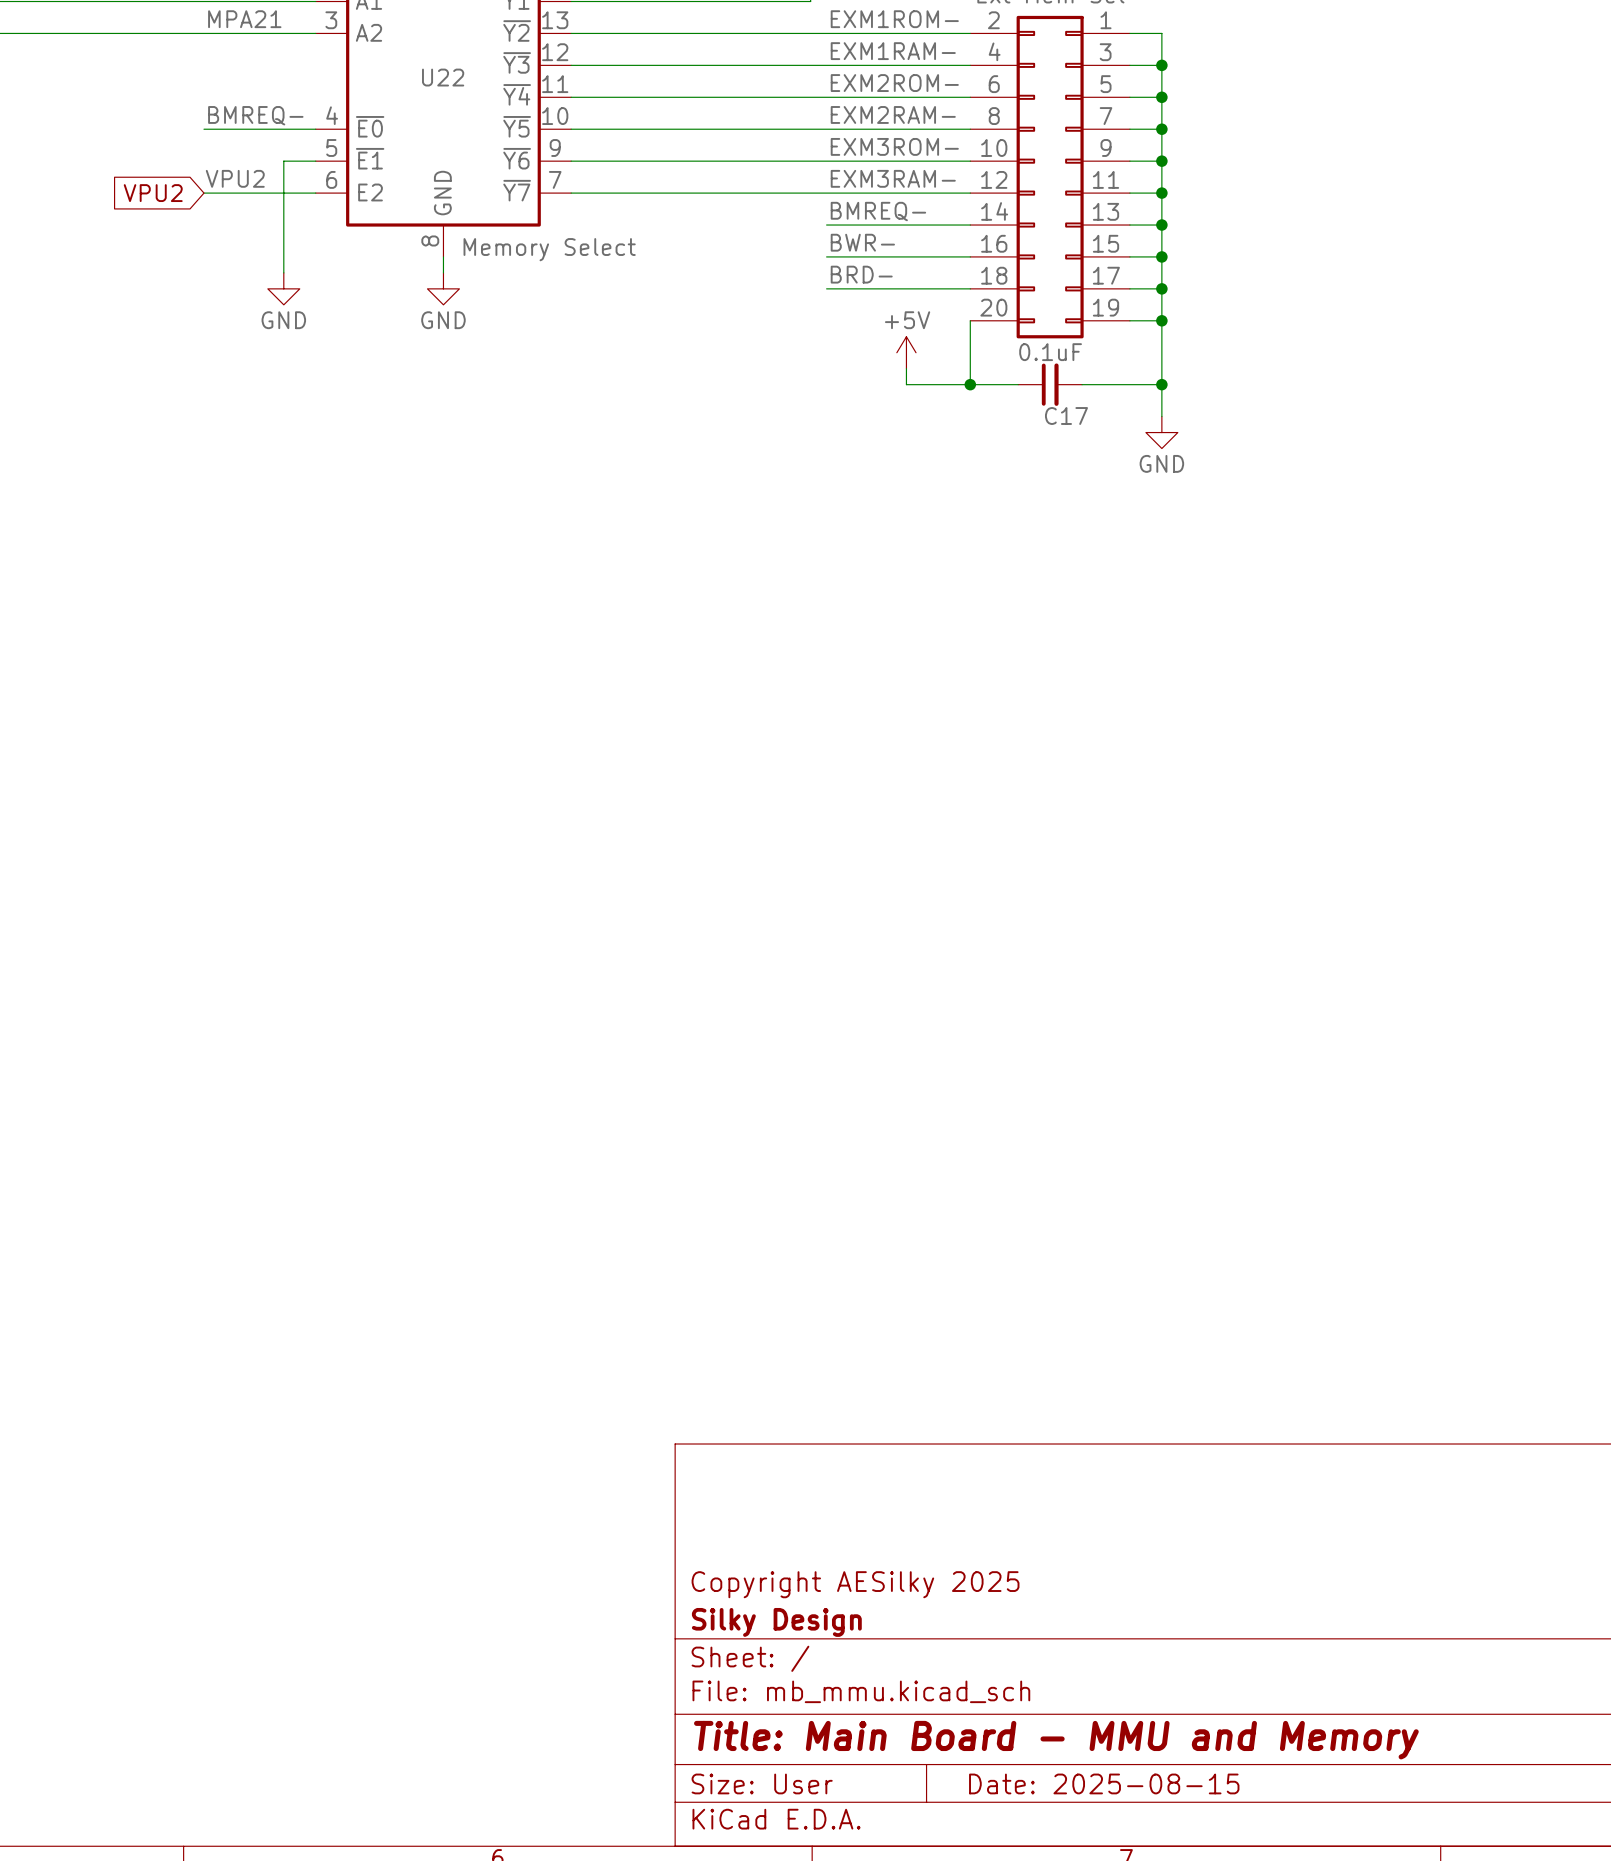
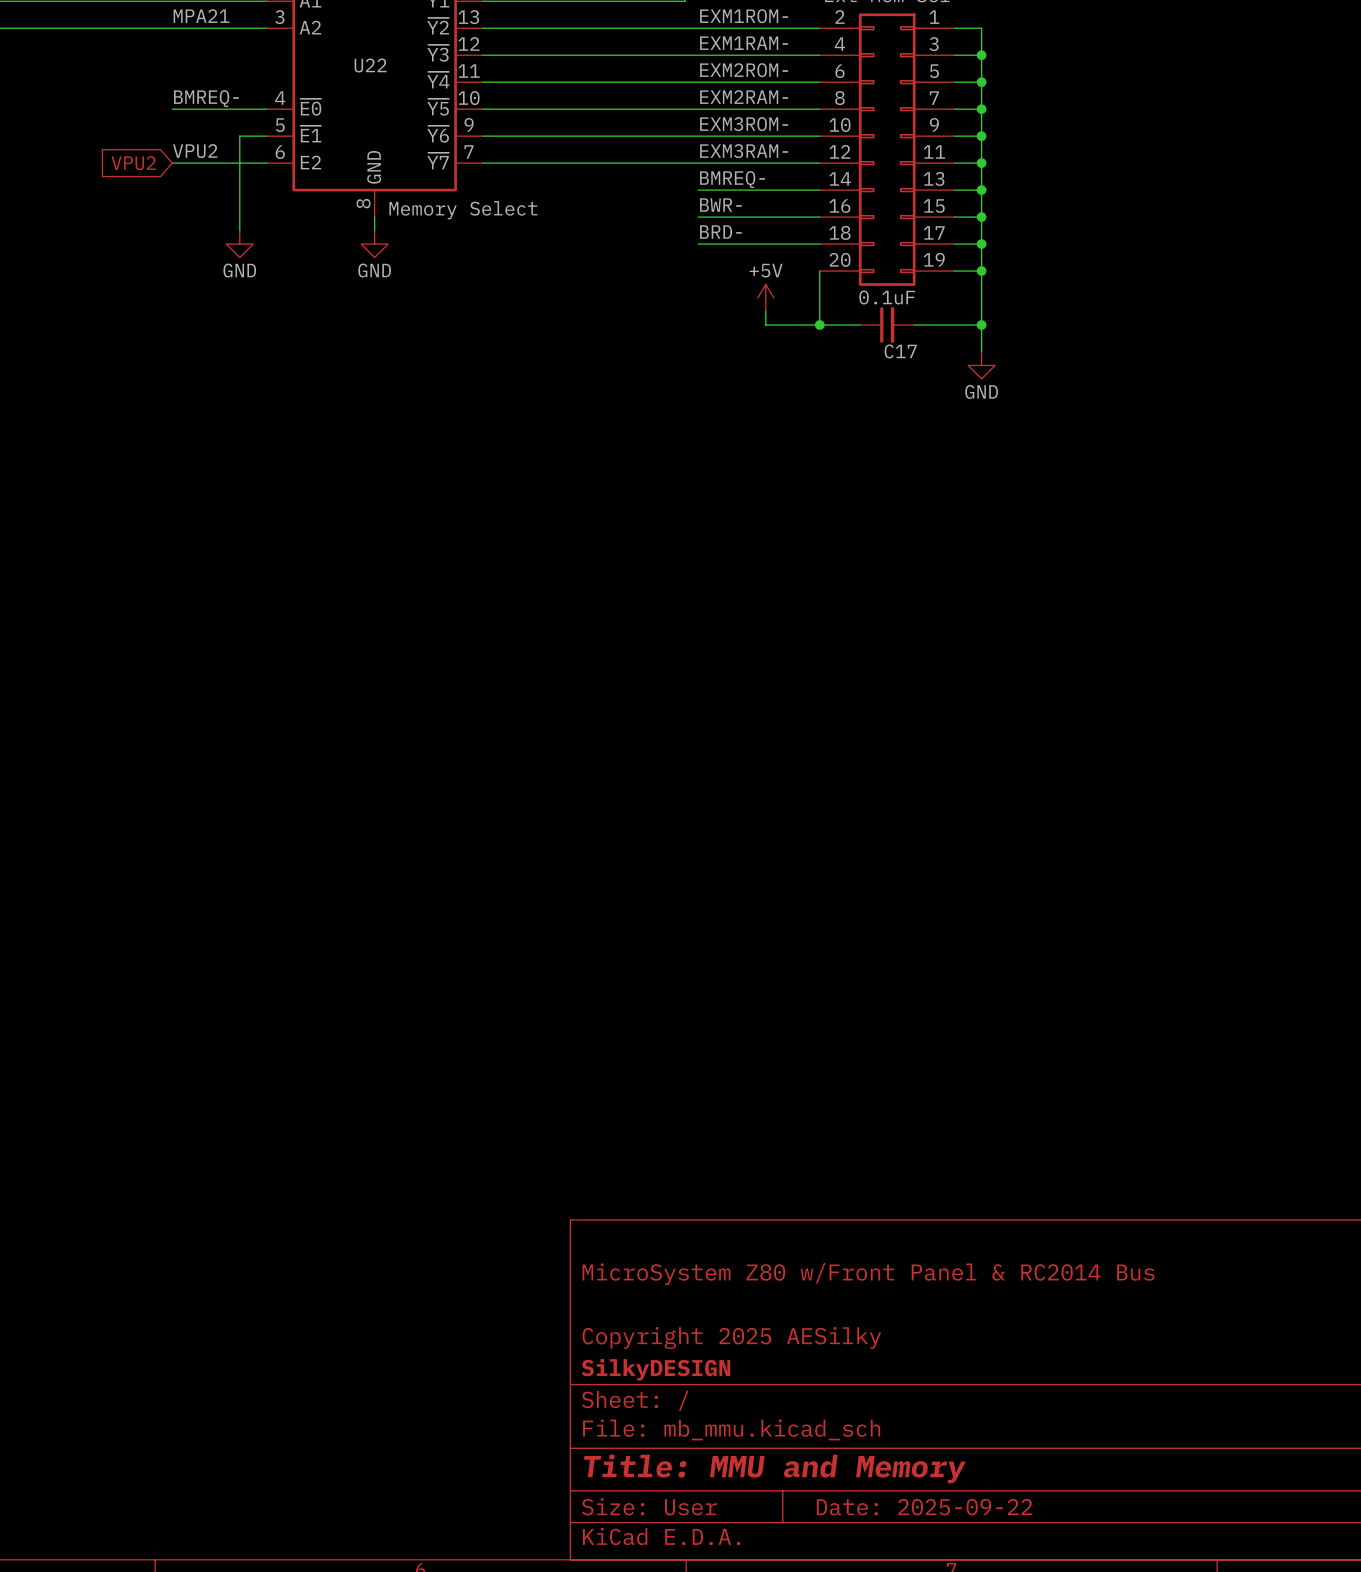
title block: none -> MicroSystem Z80 w/Front Panel & RC2014 Bus (868, 1274)
title block: Copyright AESilky 2025 (855, 1584) -> Copyright 2025 AESilky (731, 1338)
title block: Silky Design (776, 1622) -> SilkyDESIGN (655, 1369)
title block: Title: Main Board - MMU and Memory (1056, 1740) -> Title: MMU and Memory (774, 1468)
title block: Date: 2025-08-15 (1104, 1783) -> Date: 2025-09-22 (924, 1507)

